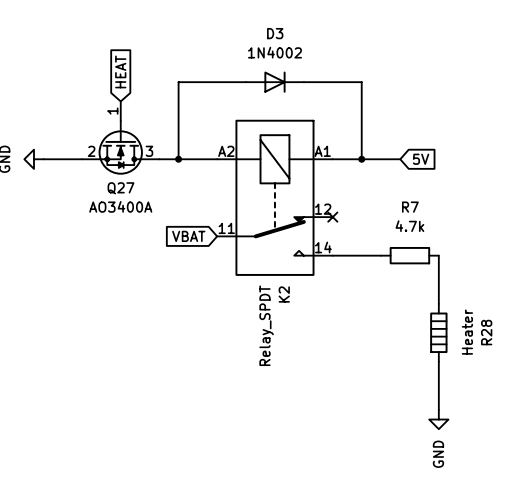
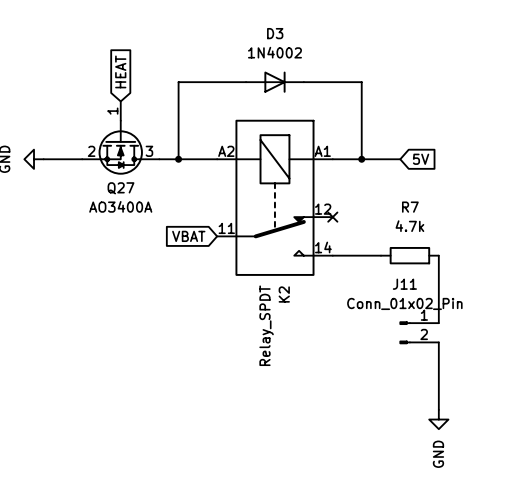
J11: none -> Conn_01x02_Pin (419, 332)
R28: Heater (438, 332) -> none

